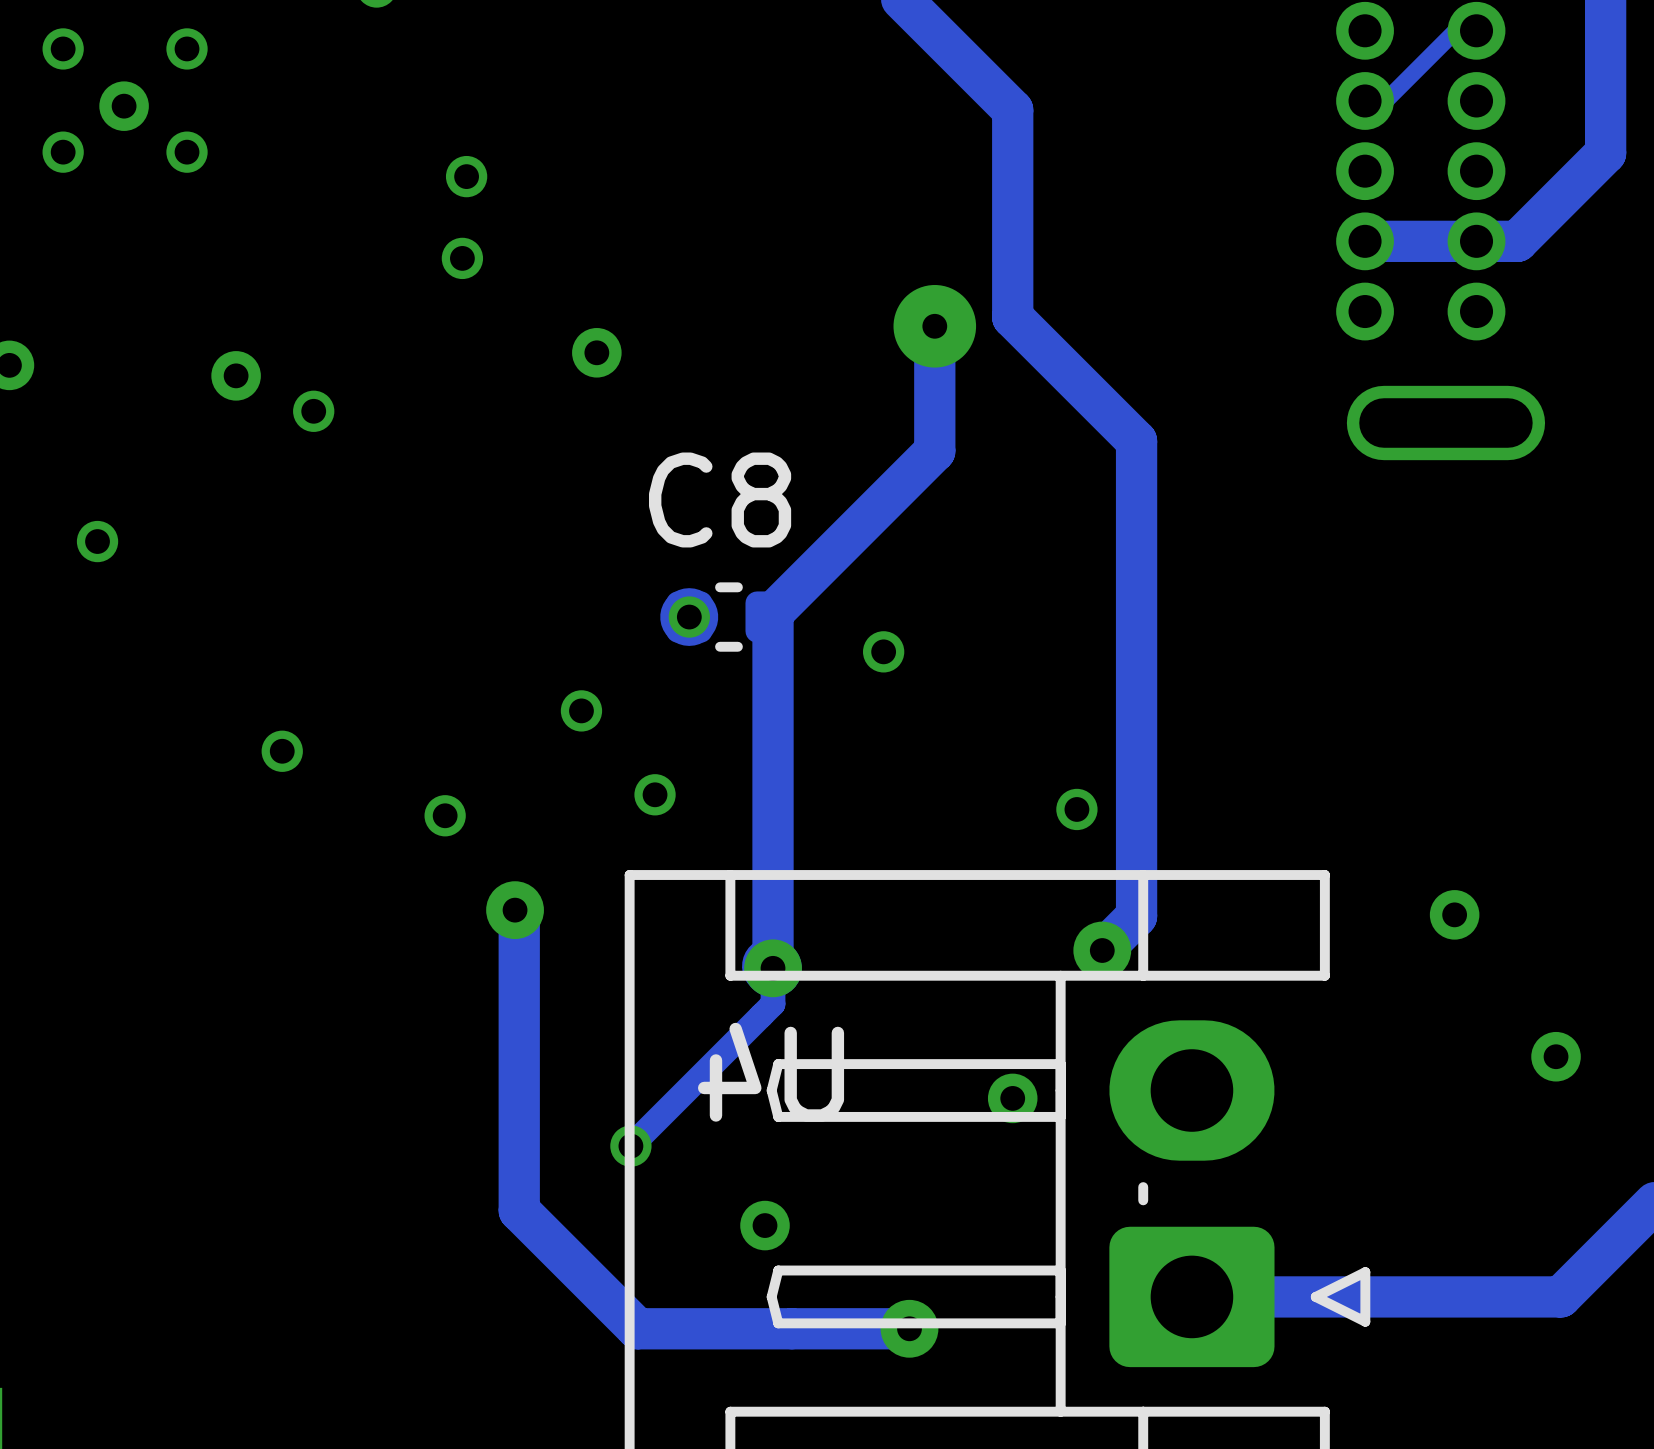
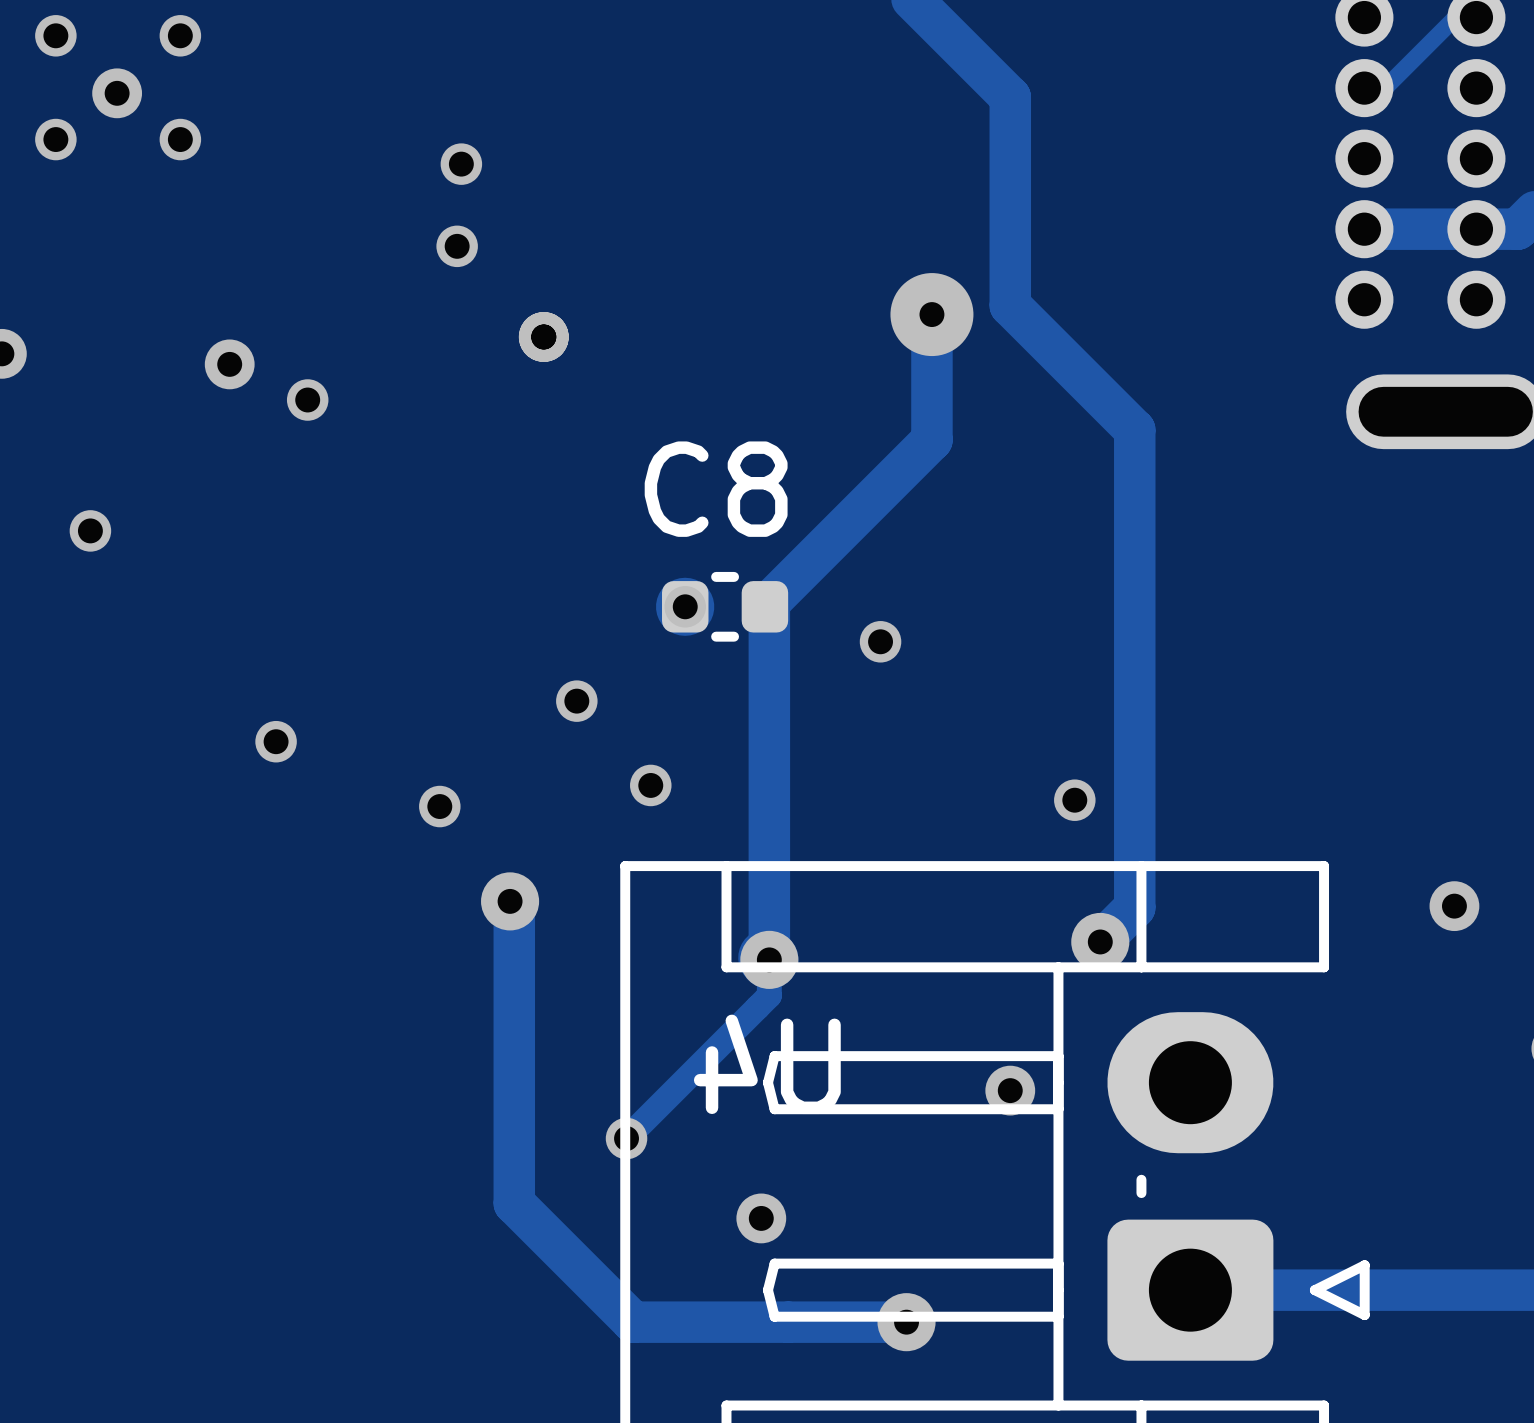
via position: (596, 352) -> (543, 336)

